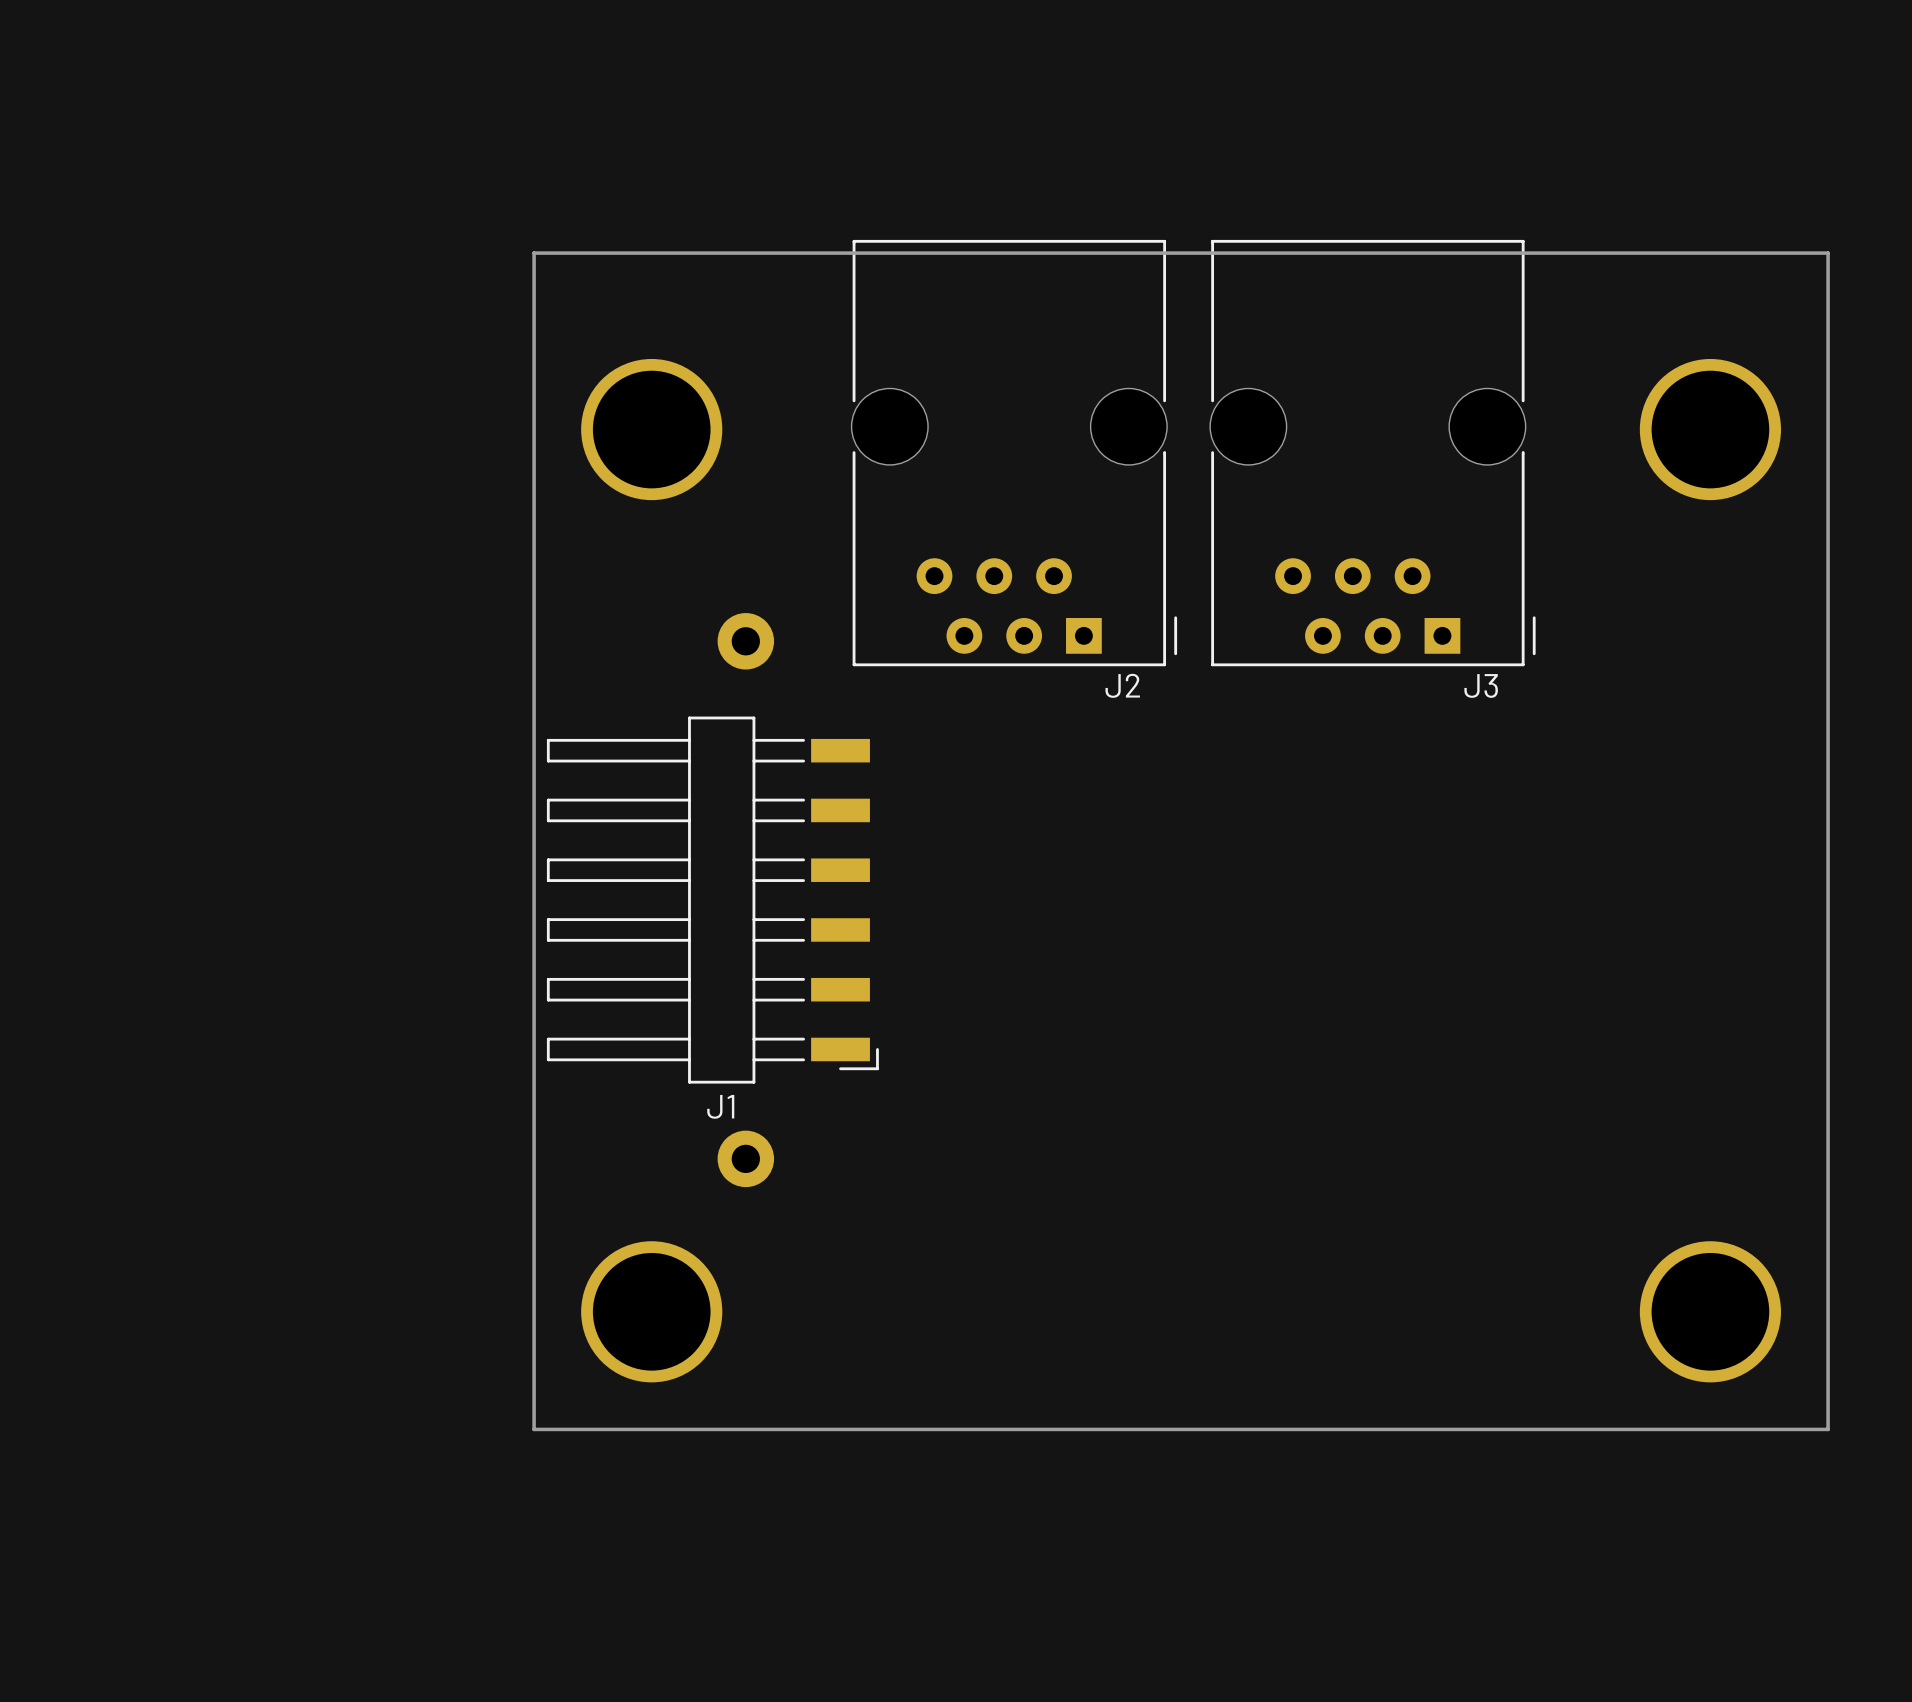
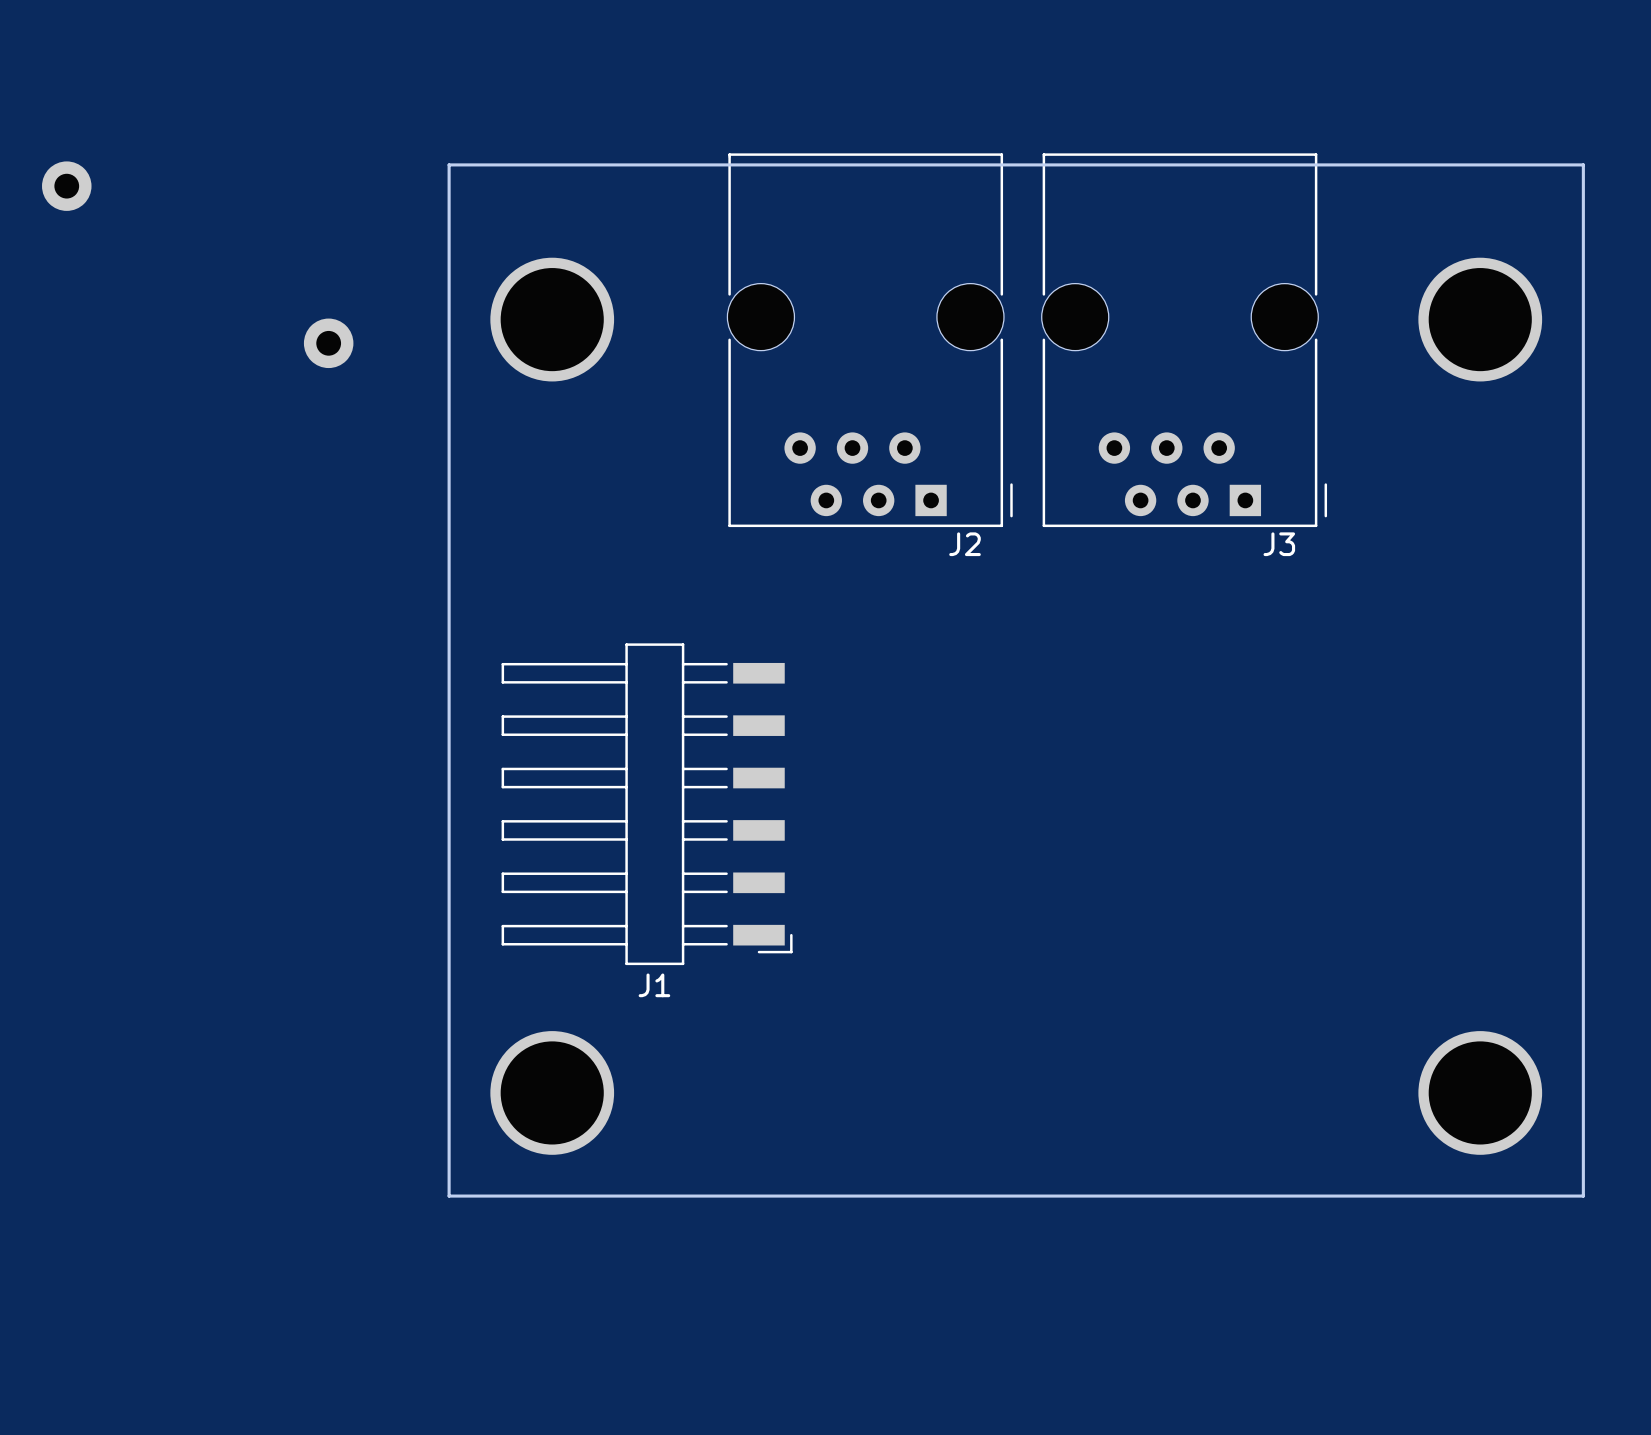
part: none -> (66, 186)
part: none -> (328, 343)
part: (745, 641) -> none
J1 position: (712, 900) -> (647, 804)
part: (745, 1158) -> none

